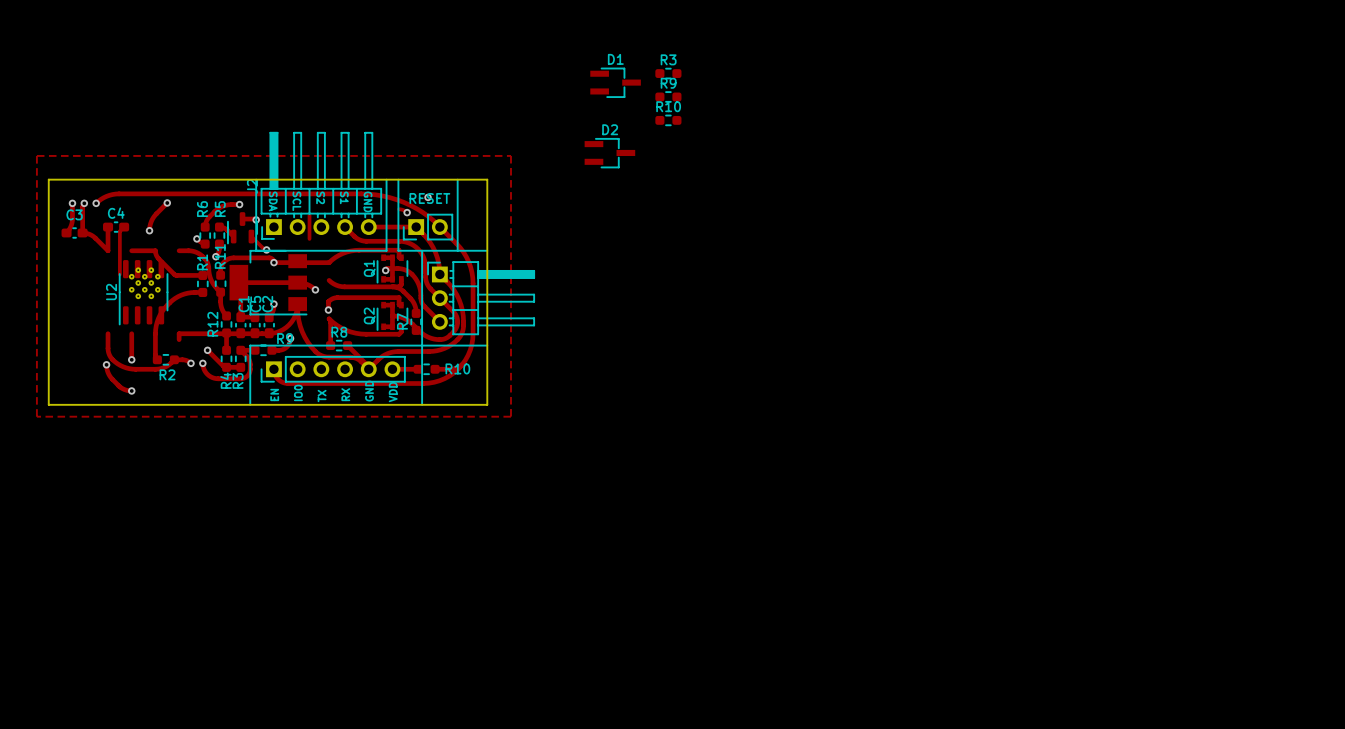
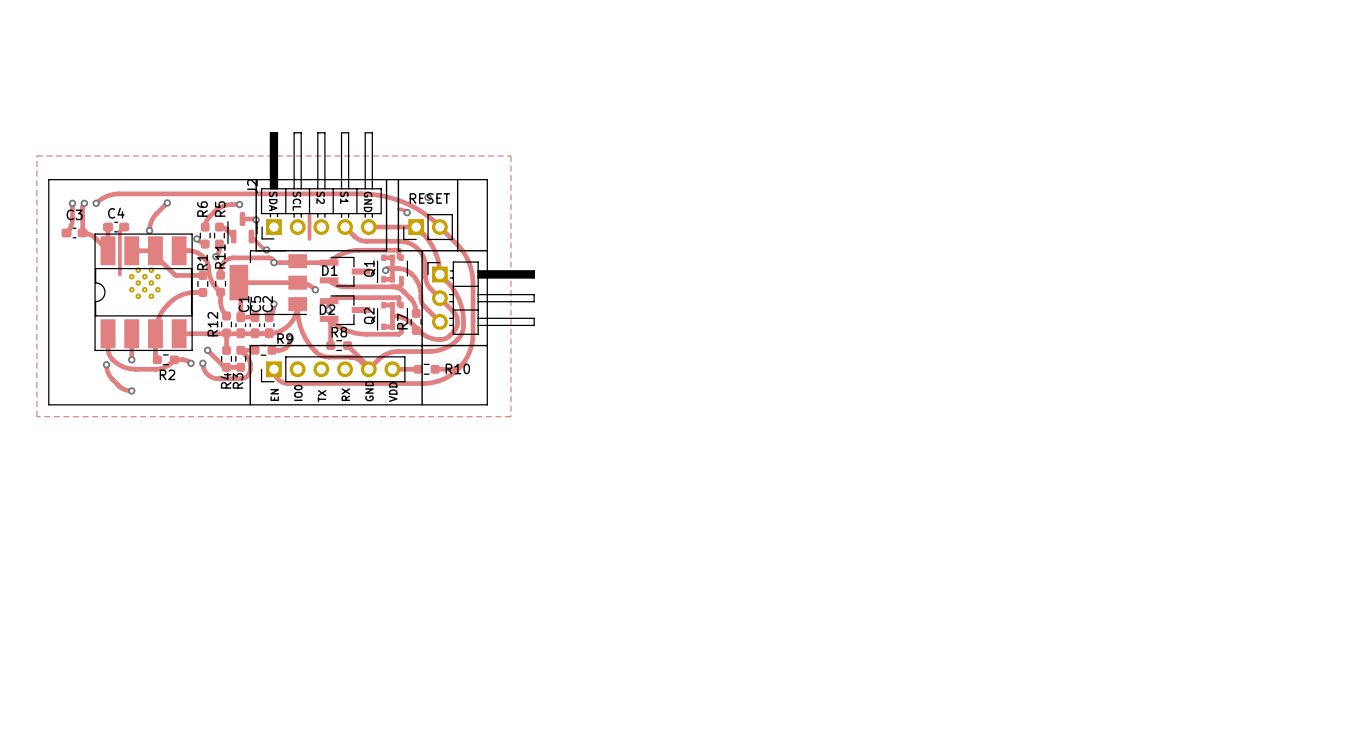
D1 name position: D1 (615, 59) -> D1 (329, 270)
R3: (668, 73) -> none
D1 position: (615, 82) -> (345, 271)
R9: (668, 96) -> none
R10: (668, 120) -> none
D2 name position: D2 (610, 129) -> D2 (327, 309)
D2 position: (609, 153) -> (345, 310)
U2: (143, 292) -> none
part: none -> (143, 292)

